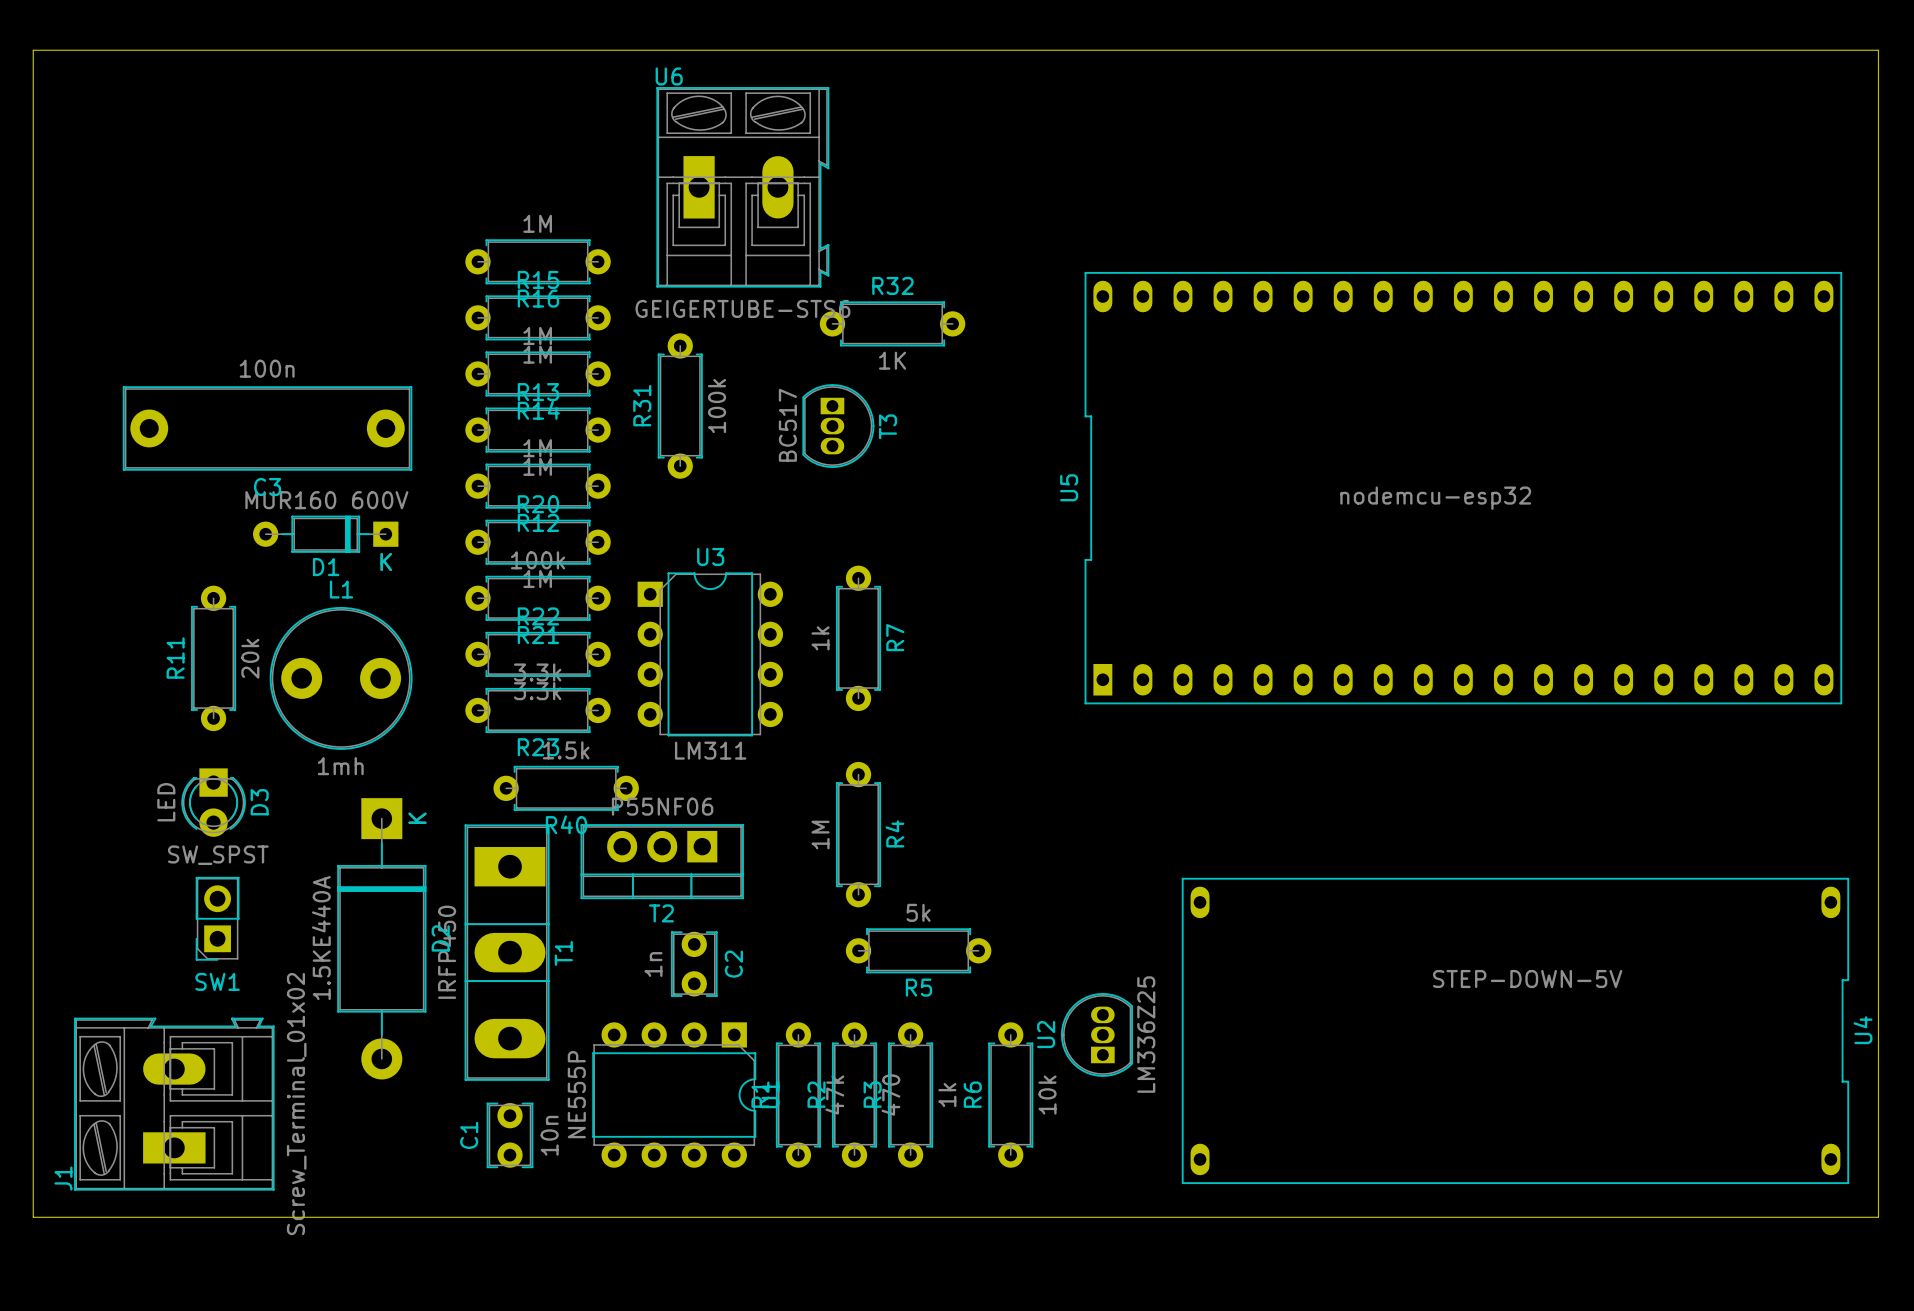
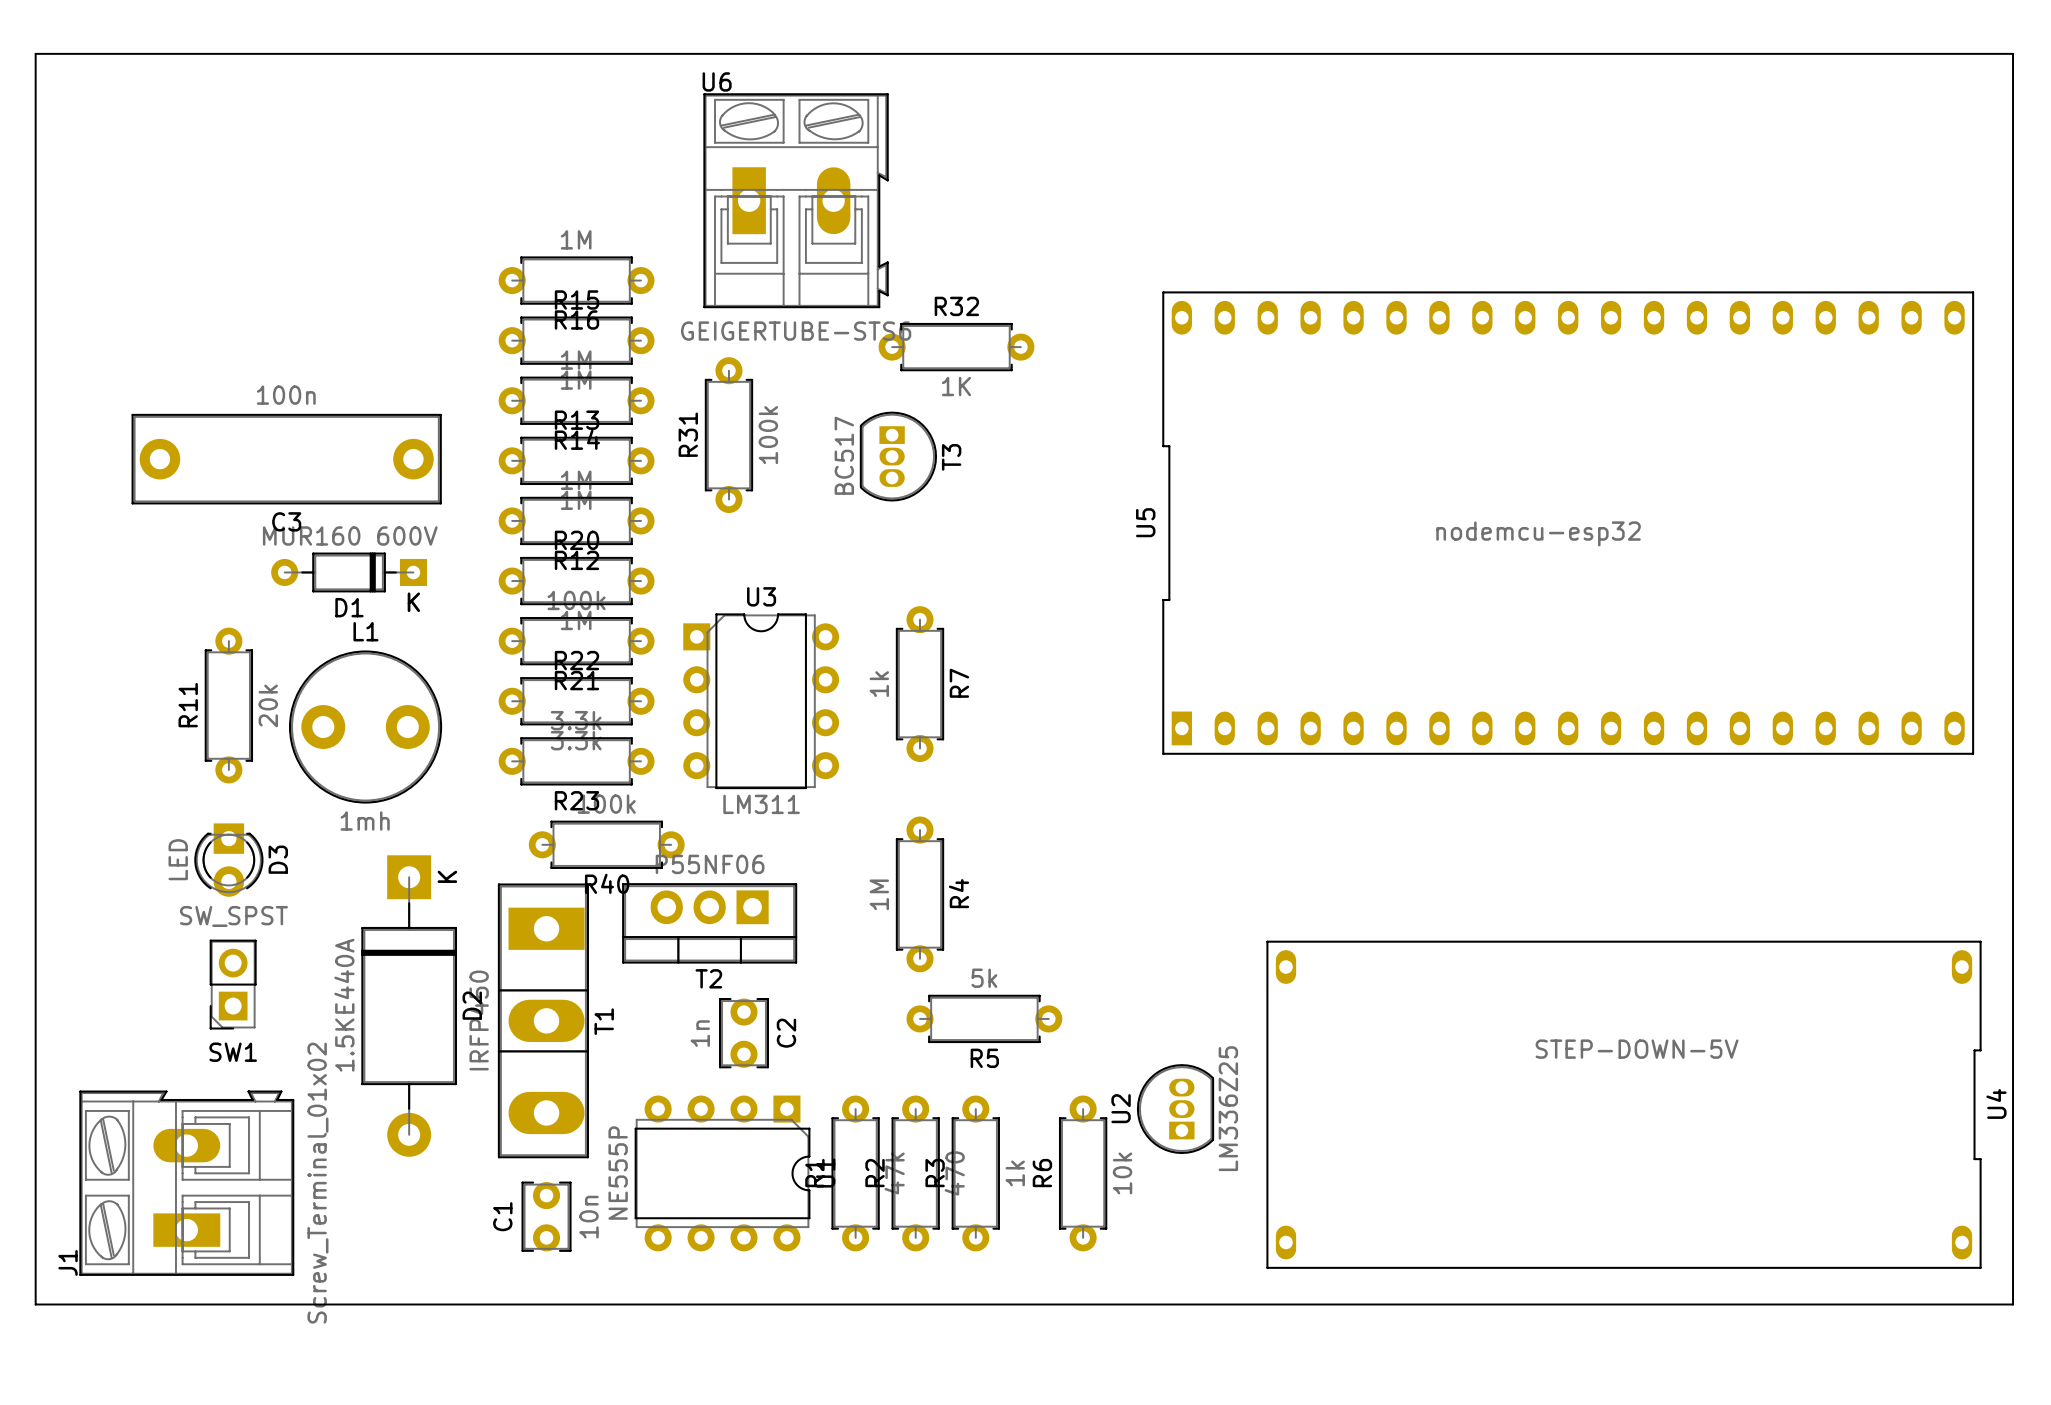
R40 value: 1.5k (566, 750) -> 100k (606, 804)

